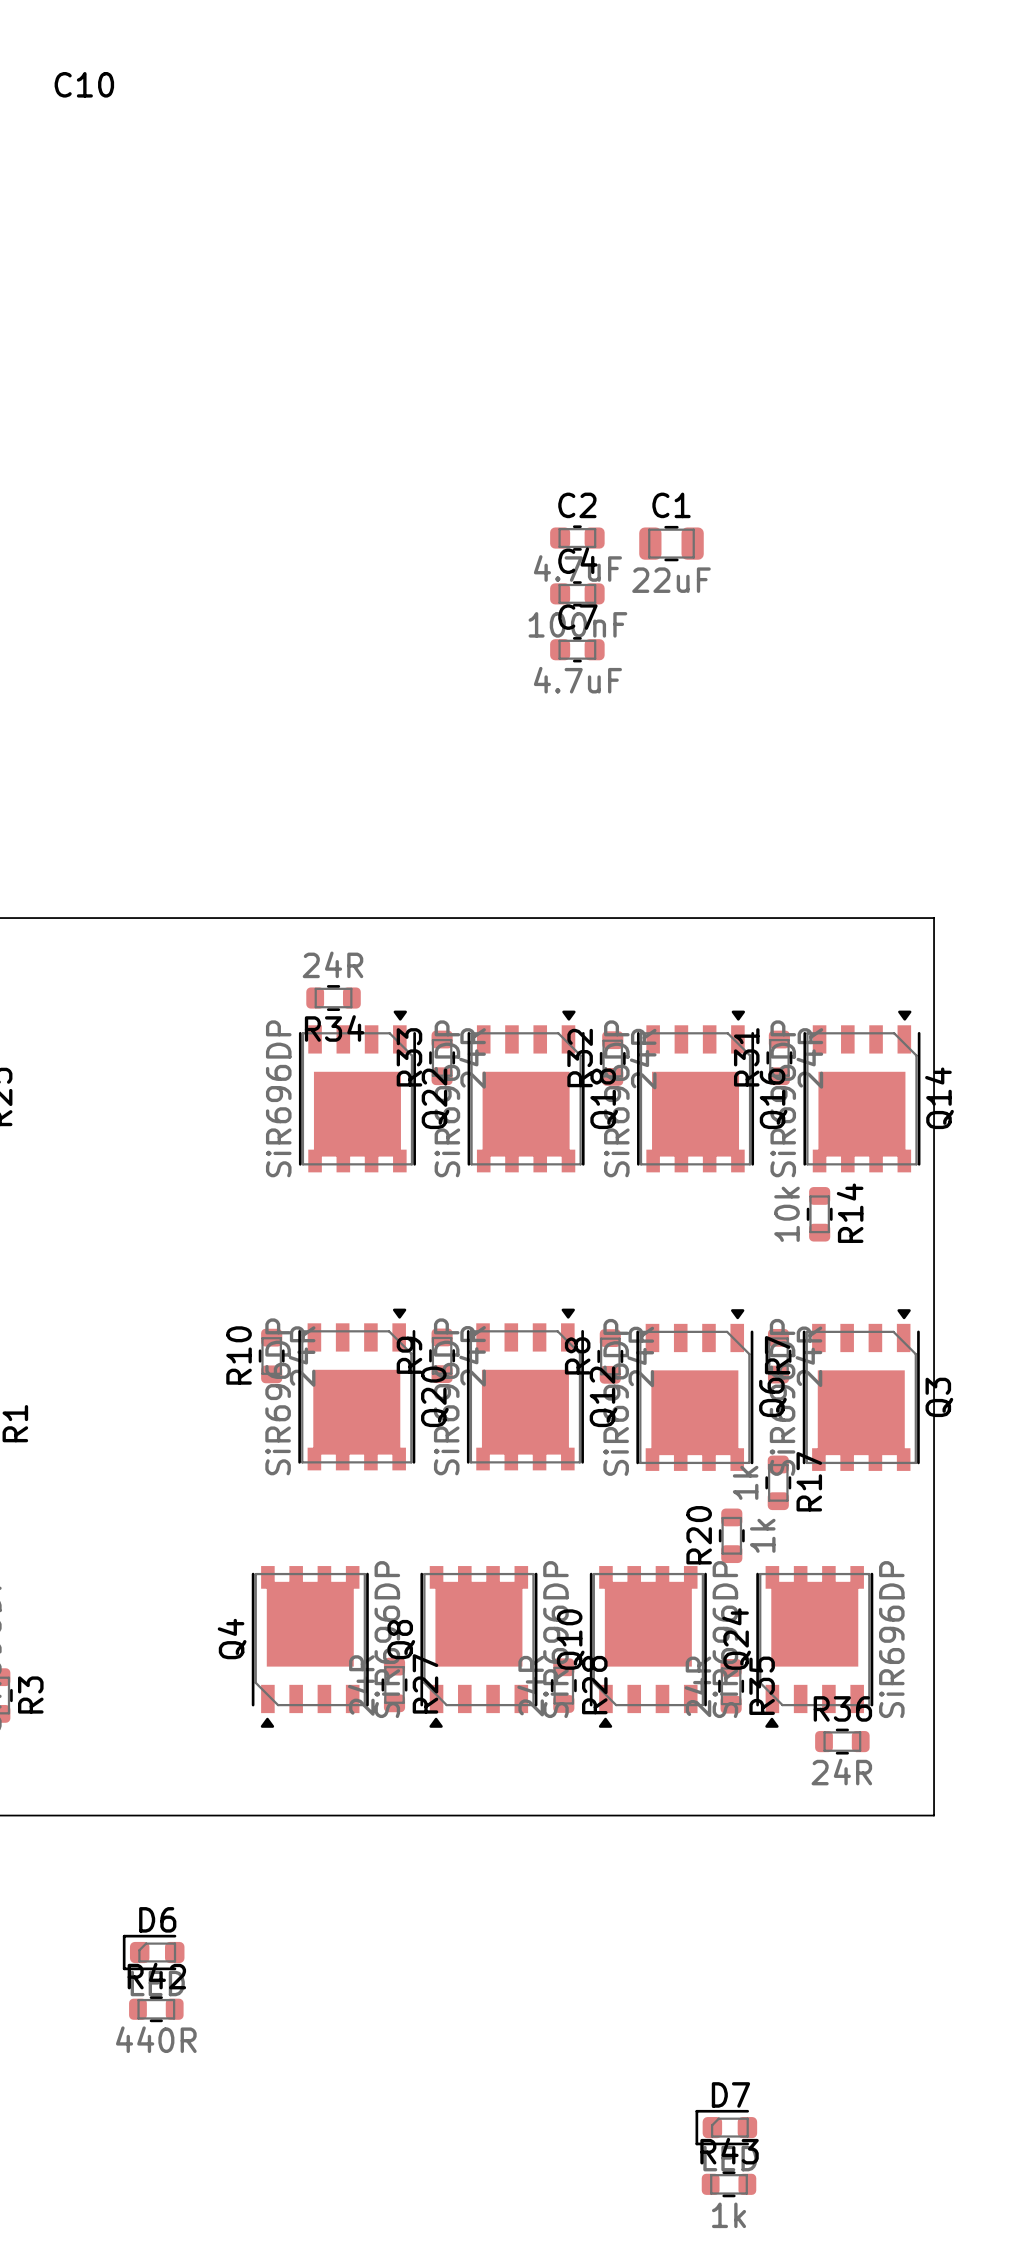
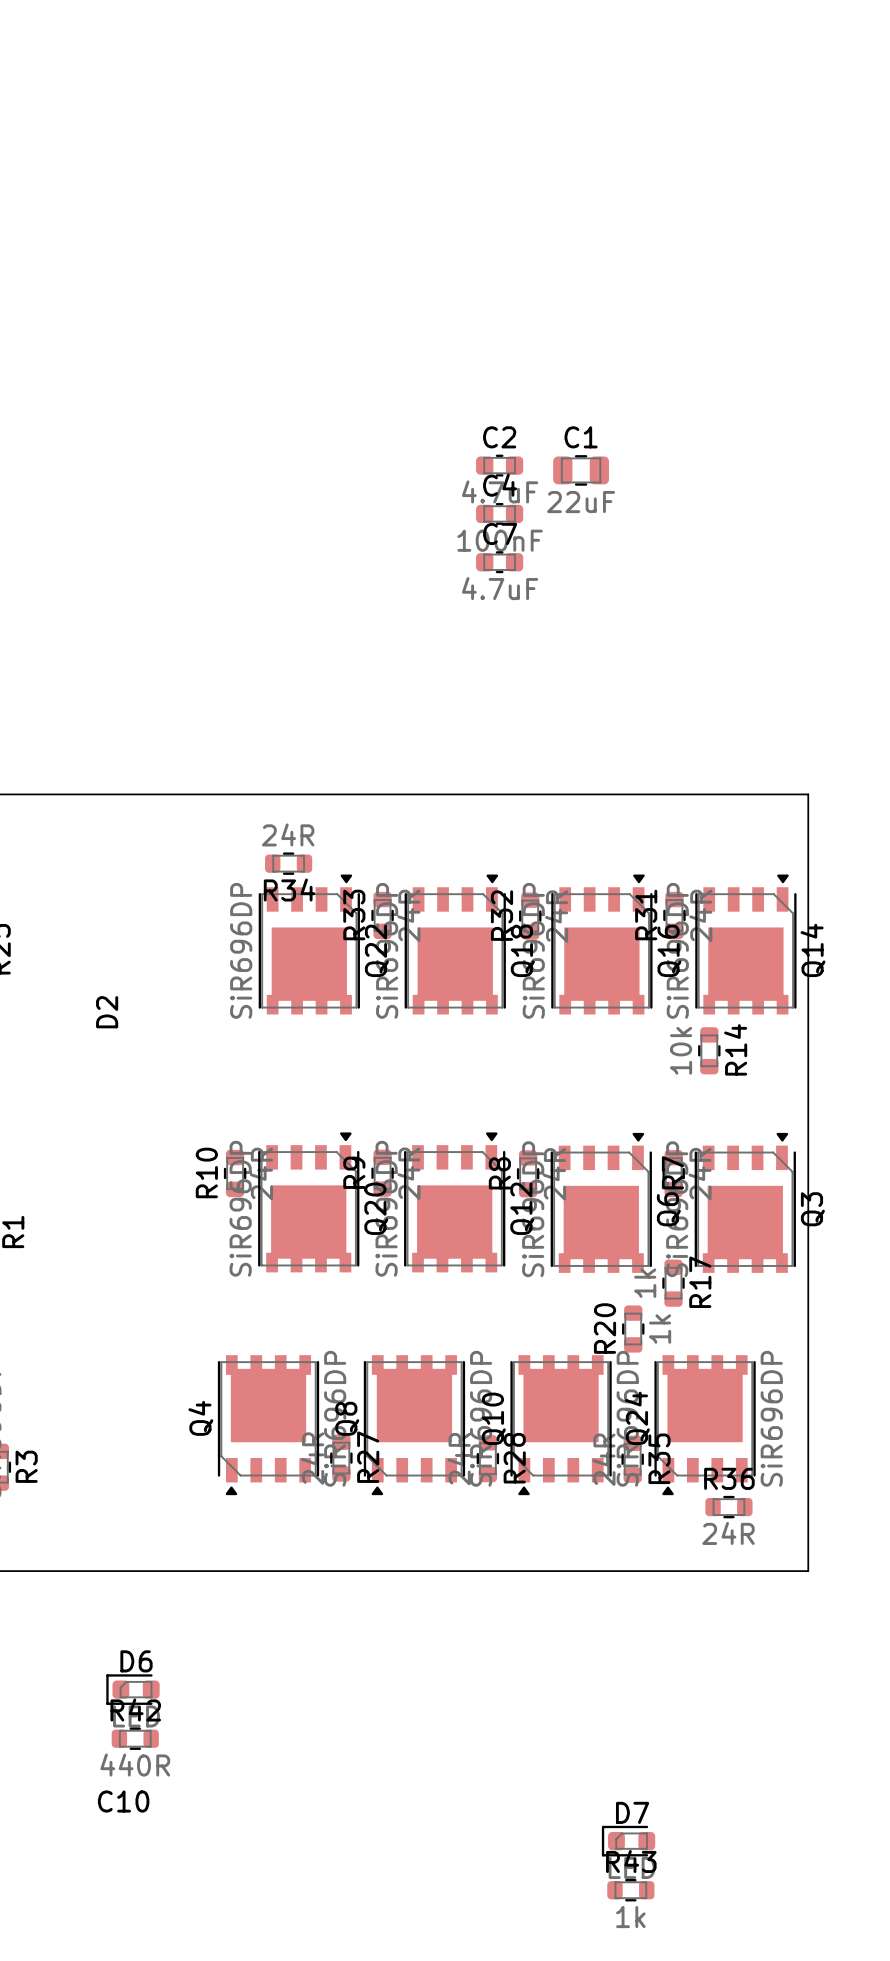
C10 position: (84, 84) -> (123, 1801)
D2: none -> (107, 1012)

